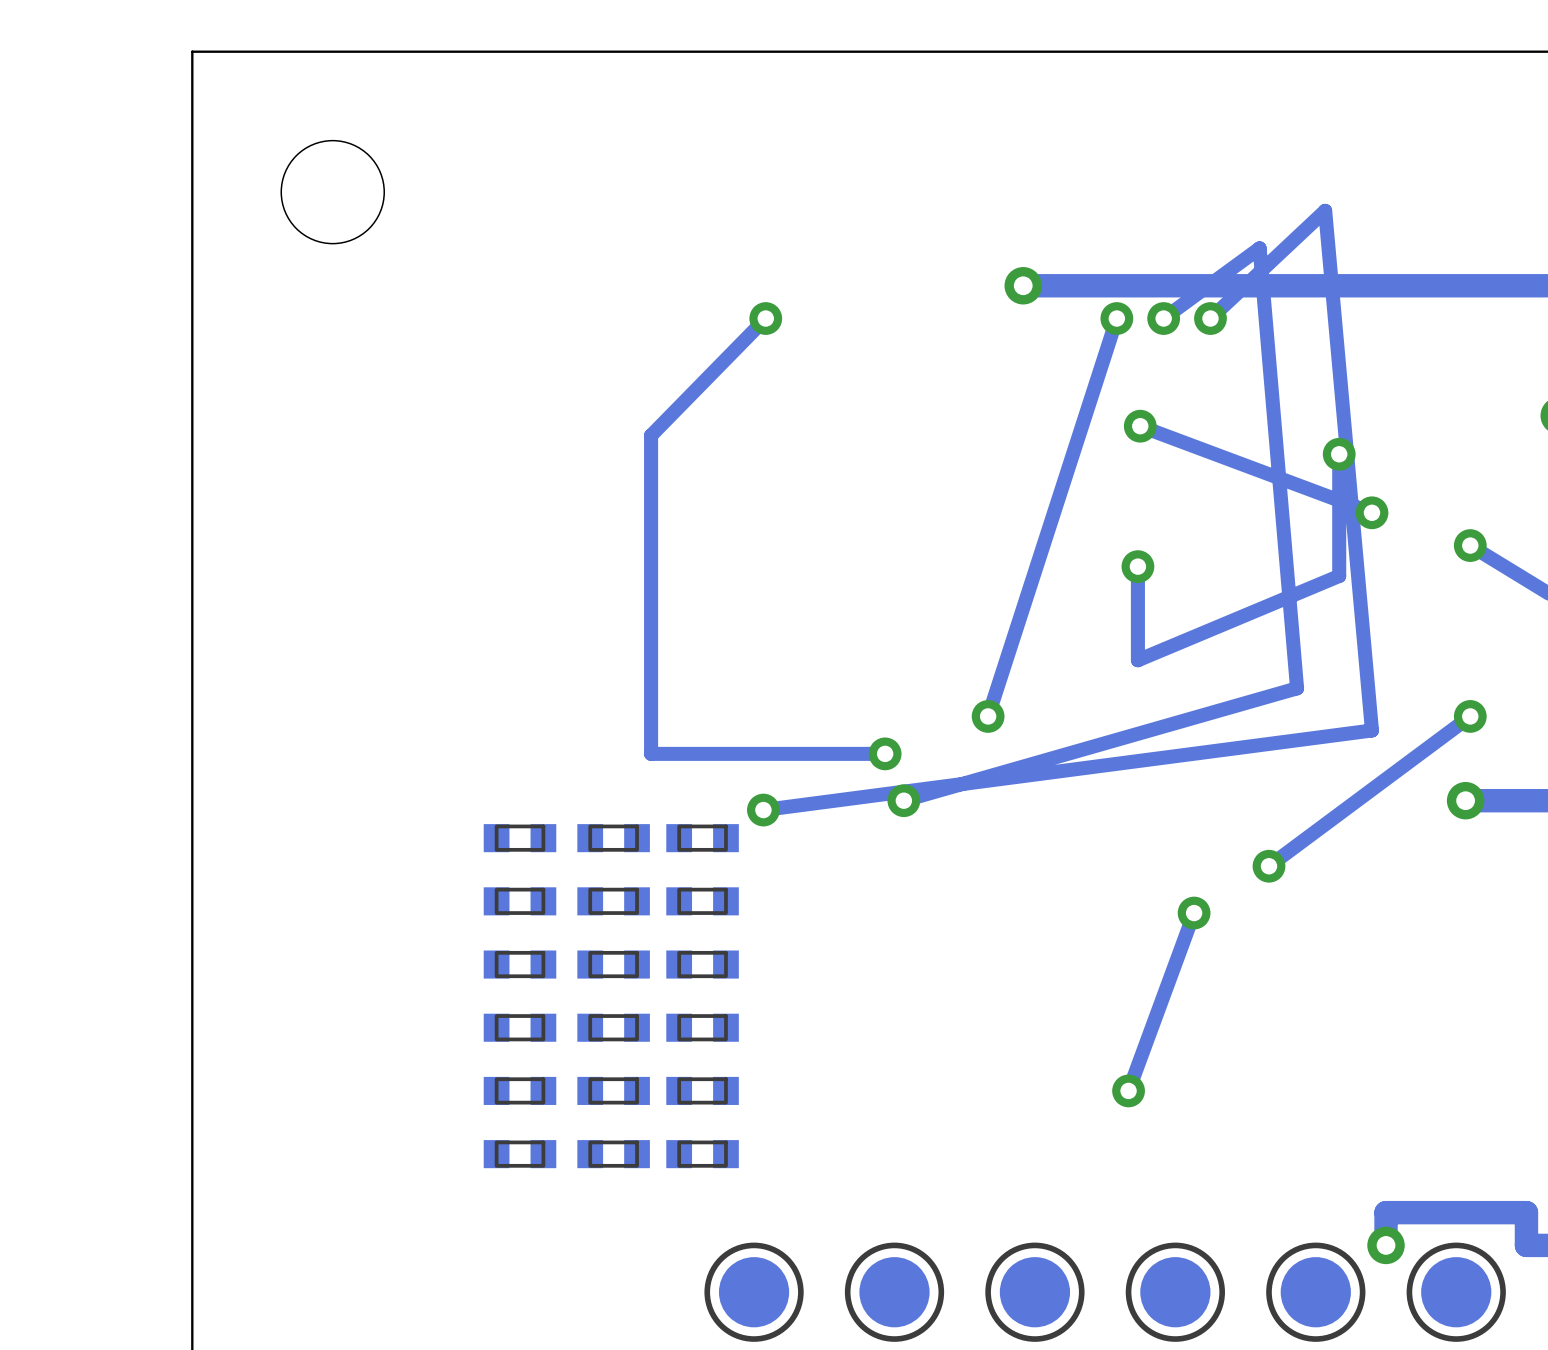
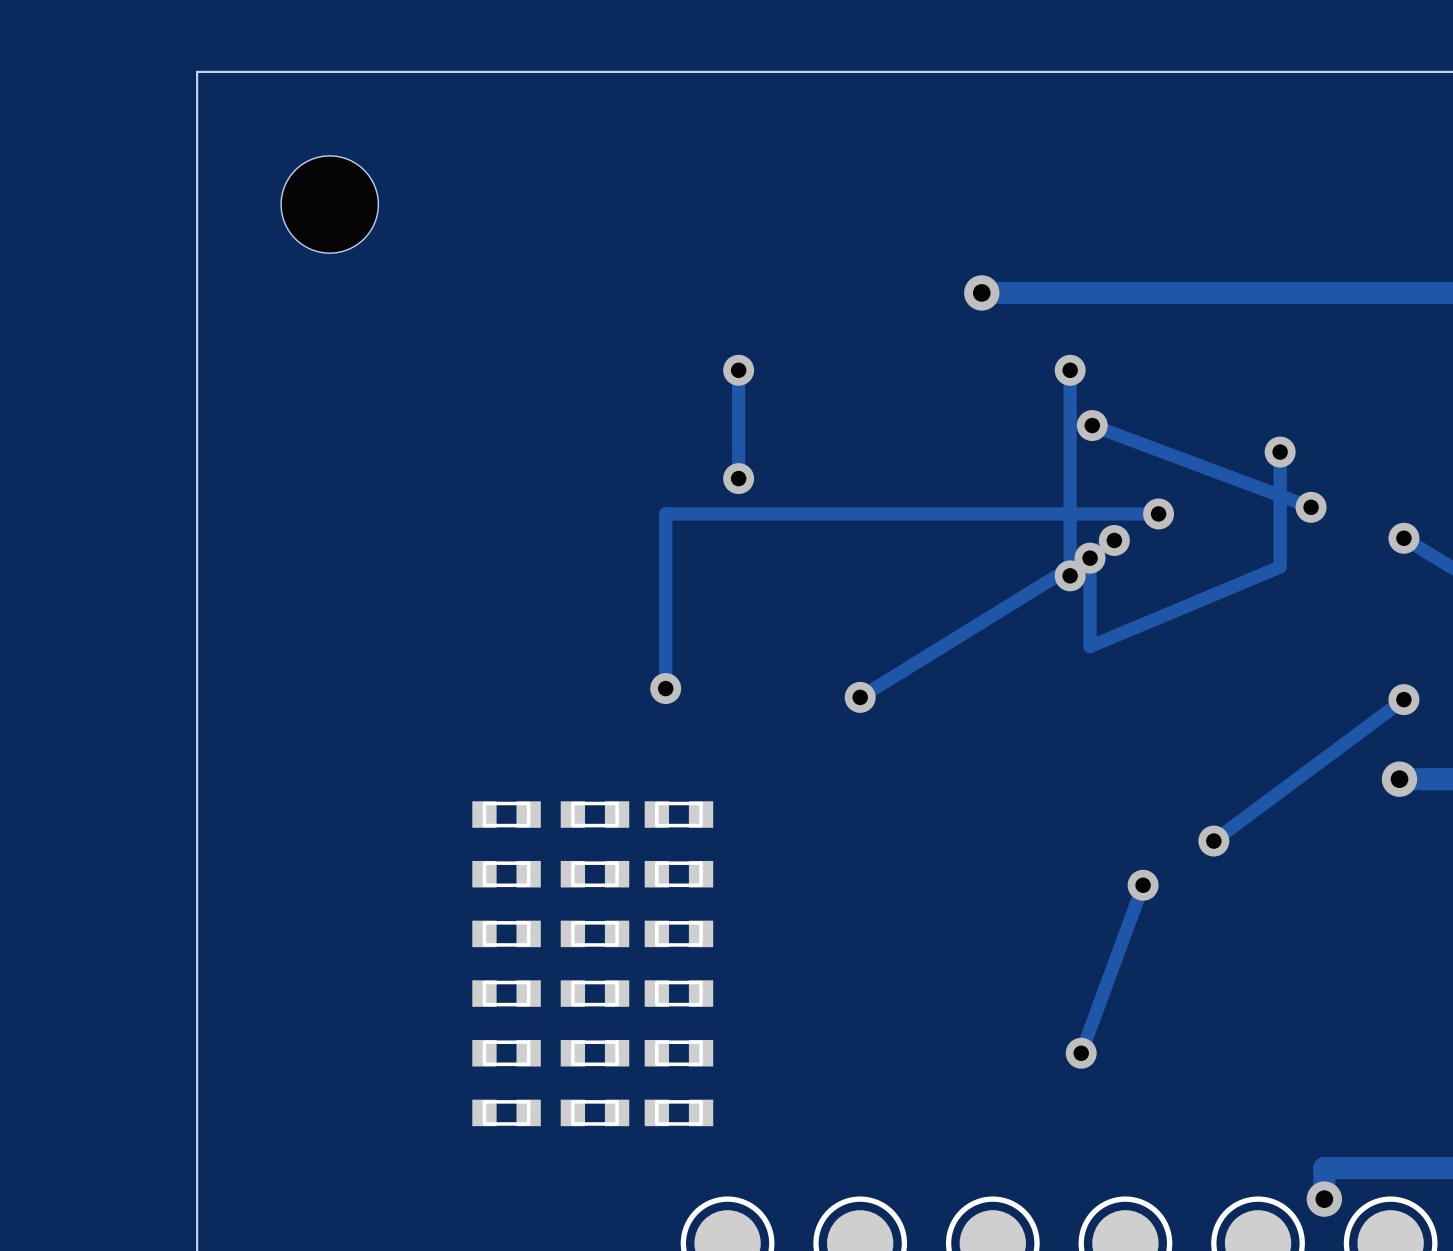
track: (765, 318) (651, 435) (651, 753) (885, 753) -> none
via position: (765, 318) -> (738, 370)
track: (1116, 318) (988, 716) -> none
via: (1116, 318) -> none
track: (1163, 318) (1259, 248) (1297, 688) (903, 800) -> none
via: (1163, 318) -> none
track: (1210, 318) (1325, 210) (1371, 730) (763, 810) -> none
via: (1210, 318) -> none
track: none -> (738, 370) (738, 478)
track: none -> (1070, 370) (1070, 575)
via: none -> (1070, 370)
via: none -> (738, 478)
track: none -> (1158, 513) (665, 513) (665, 688)
via: none -> (1158, 513)
track: none -> (1114, 540) (860, 697)
via: none -> (1114, 540)
via: none -> (1070, 575)
via: none -> (665, 688)
via: (988, 716) -> none
via position: (885, 753) -> (860, 697)
via: (903, 800) -> none
via: (763, 810) -> none

